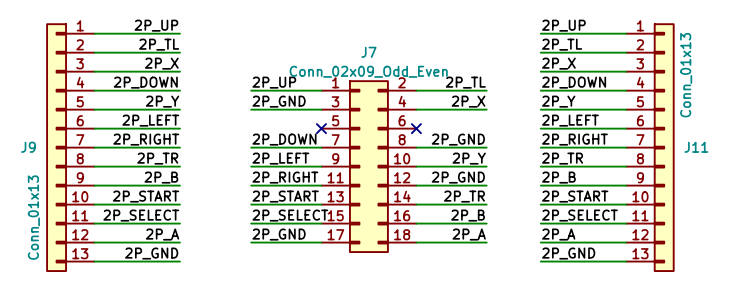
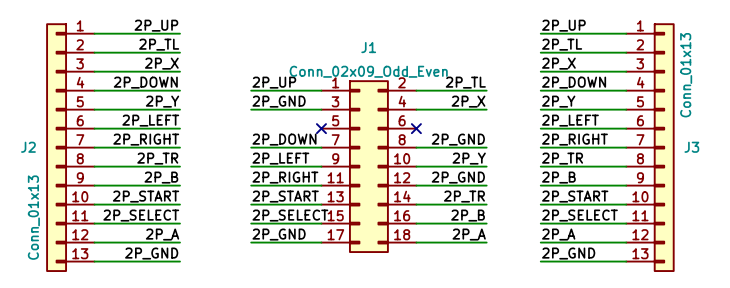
J7 name: J7 (368, 52) -> J1 (368, 47)
J9 name: J9 (28, 147) -> J2 (28, 147)
J11 name: J11 (696, 147) -> J3 (691, 147)

